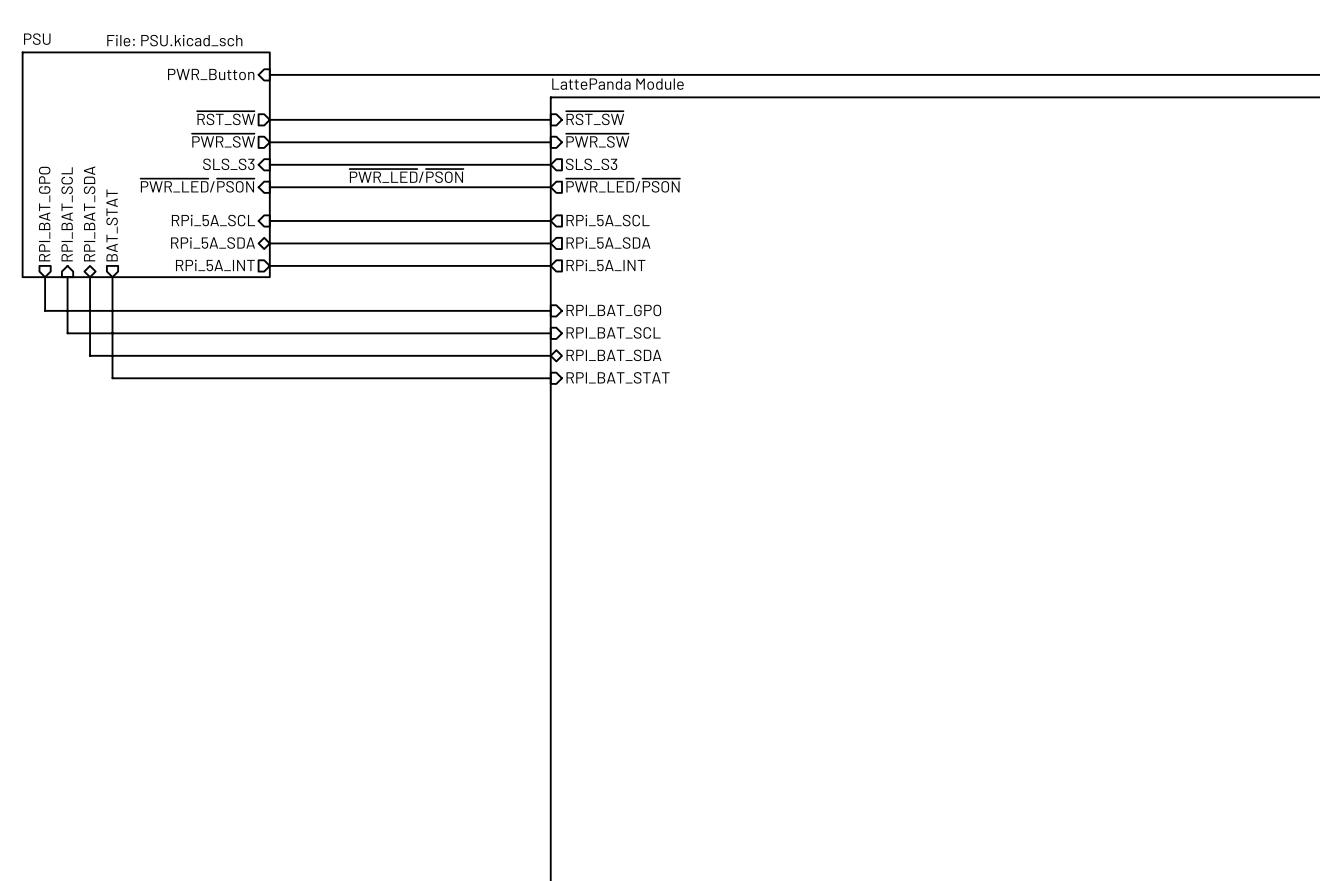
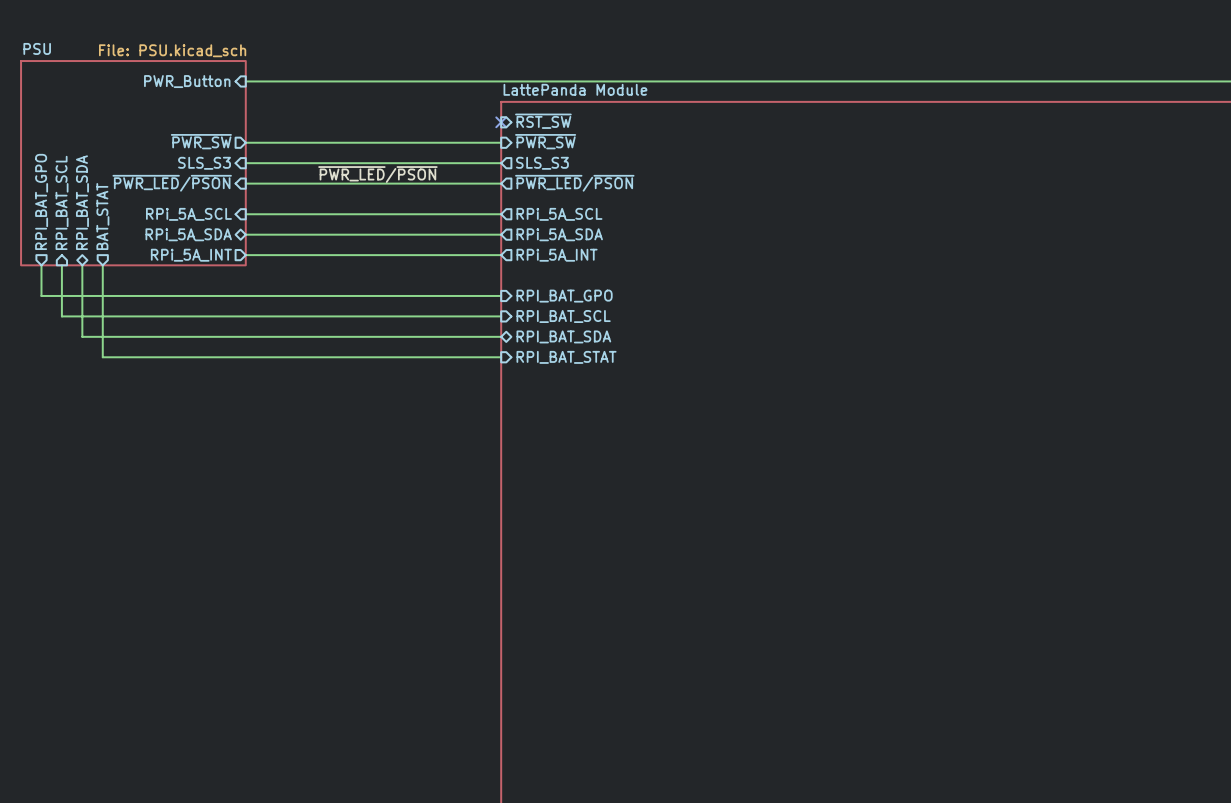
sheet pin: ~{RST_SW} (226, 118) -> none
wire: (269, 119) (550, 119) -> none
no-connect mark: none -> (501, 122)

